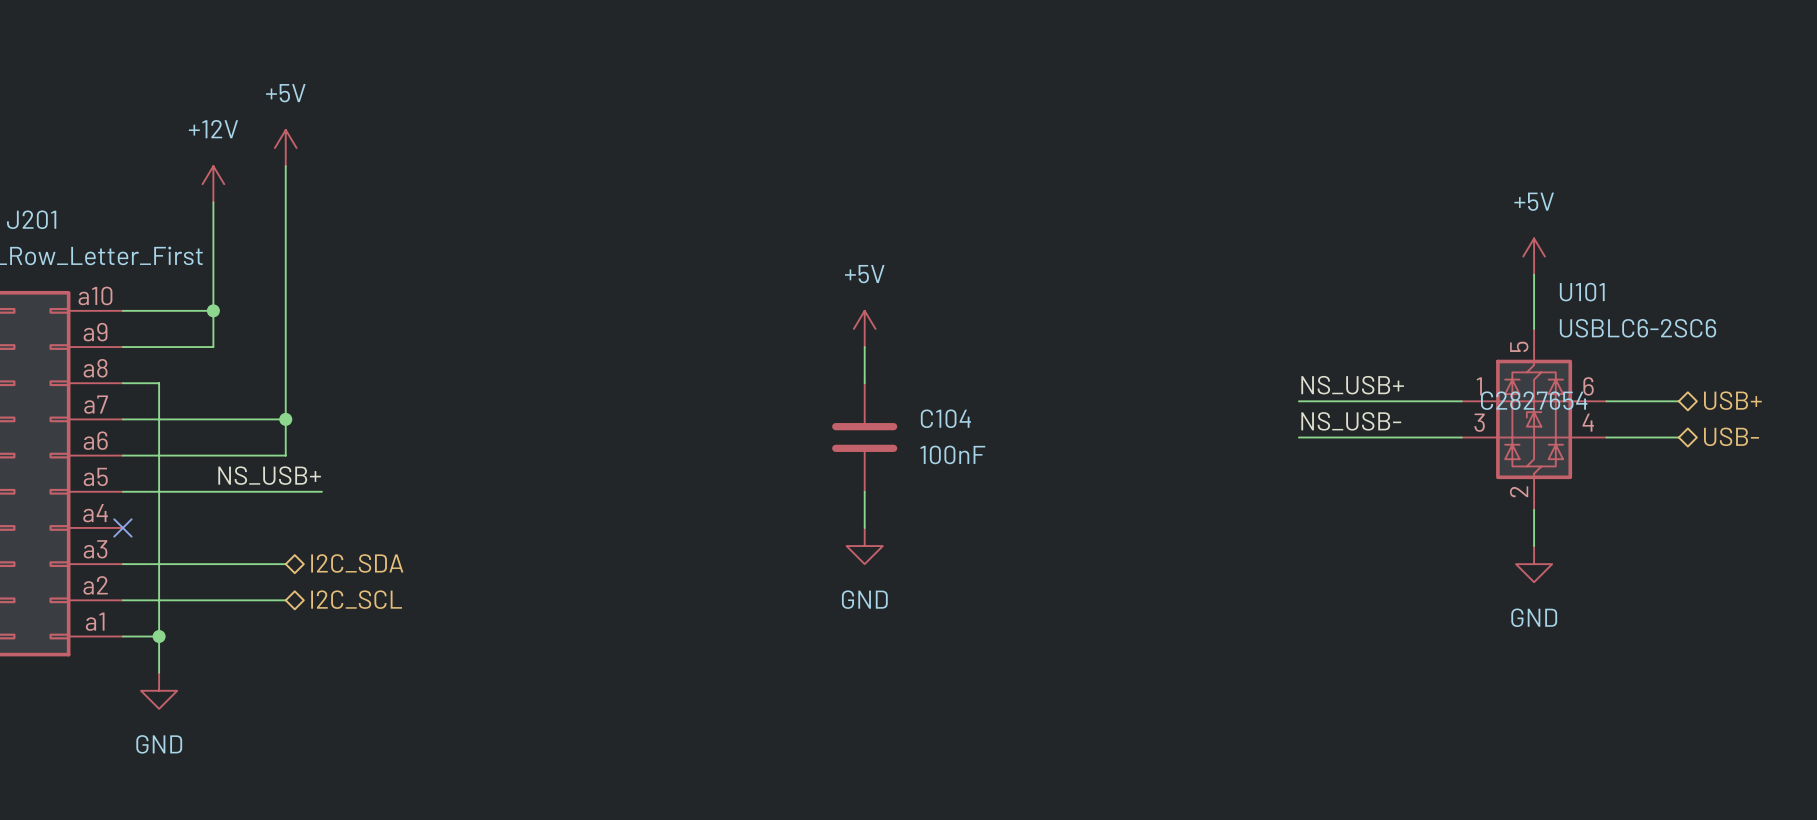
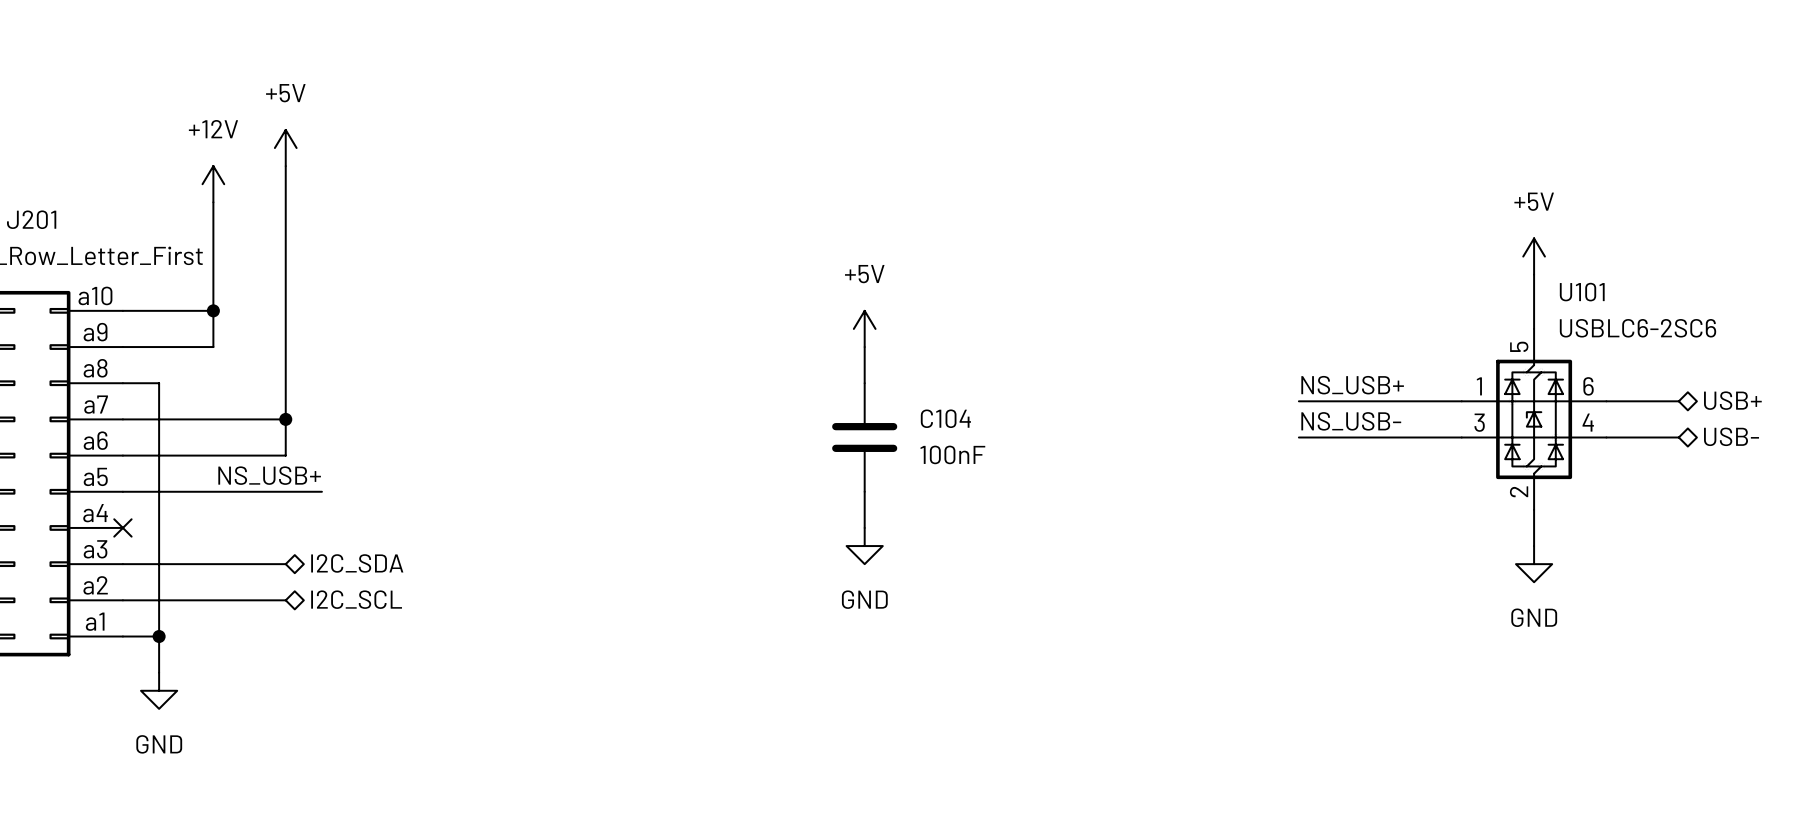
U101 text: C2827654 (1534, 400) -> none

